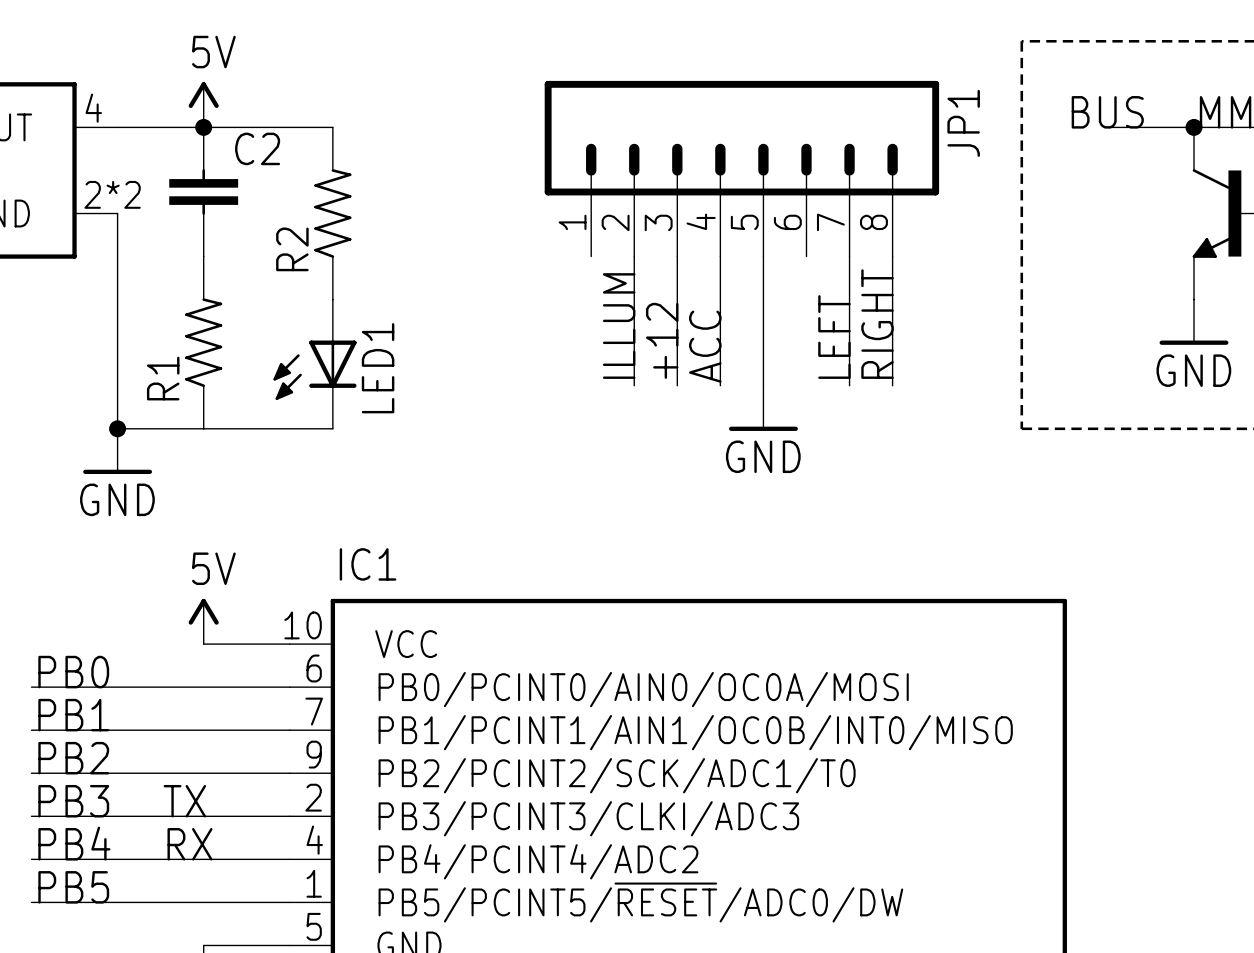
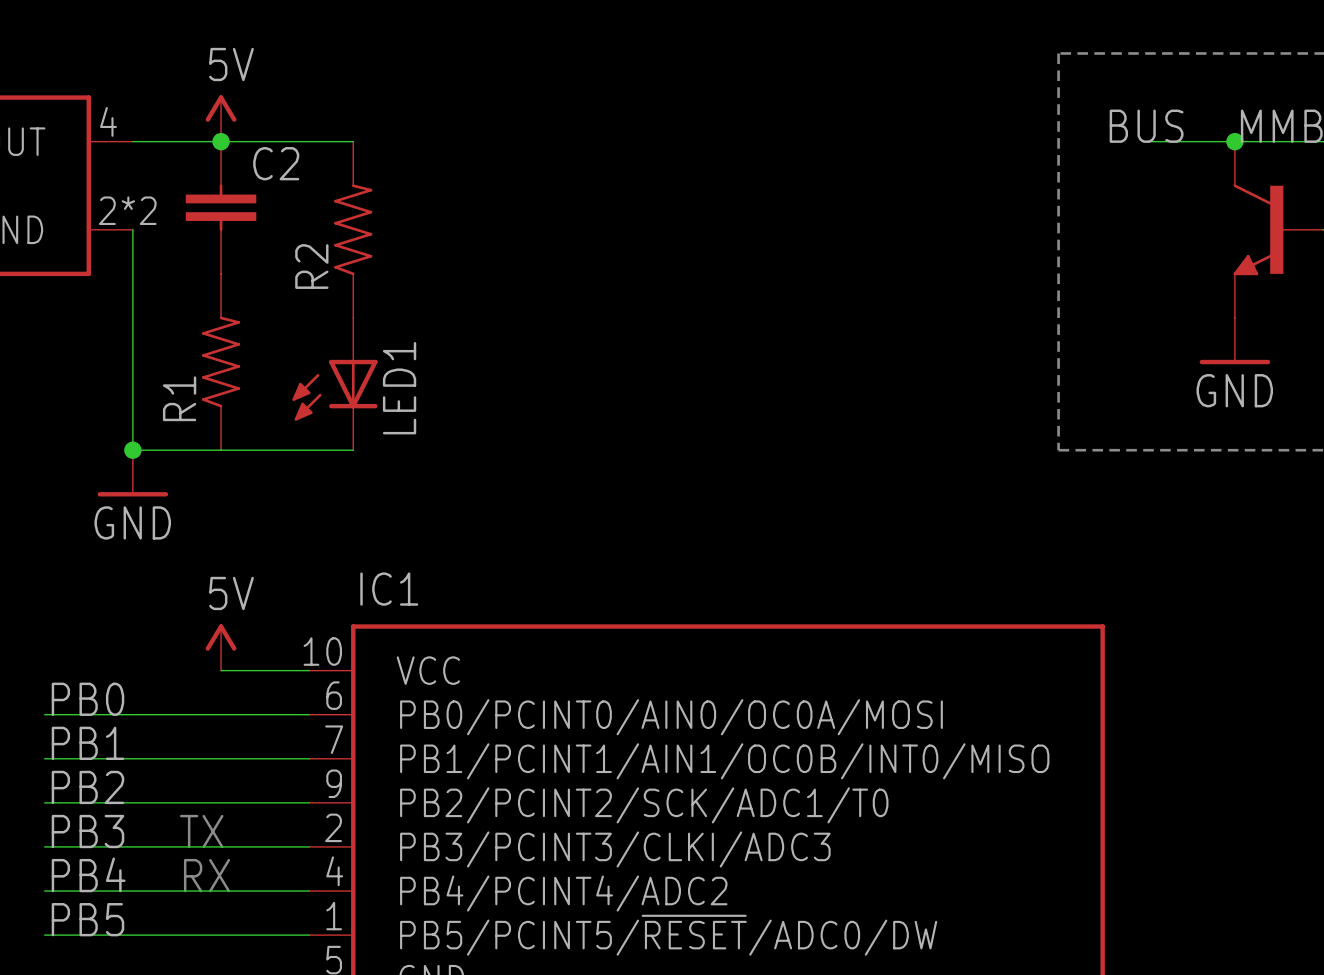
JP1: (741, 168) -> none
wire: (634, 256) (634, 385) -> none
wire: (677, 256) (677, 385) -> none
wire: (720, 256) (720, 385) -> none
wire: (763, 256) (763, 385) -> none
wire: (849, 256) (849, 385) -> none
wire: (892, 256) (892, 385) -> none
label: RIGHT (877, 324) -> none
label: ILLUM (619, 326) -> none
label: LEFT (834, 337) -> none
label: +12 (662, 340) -> none
label: ACC (705, 346) -> none
power symbol: GND (763, 408) -> none

